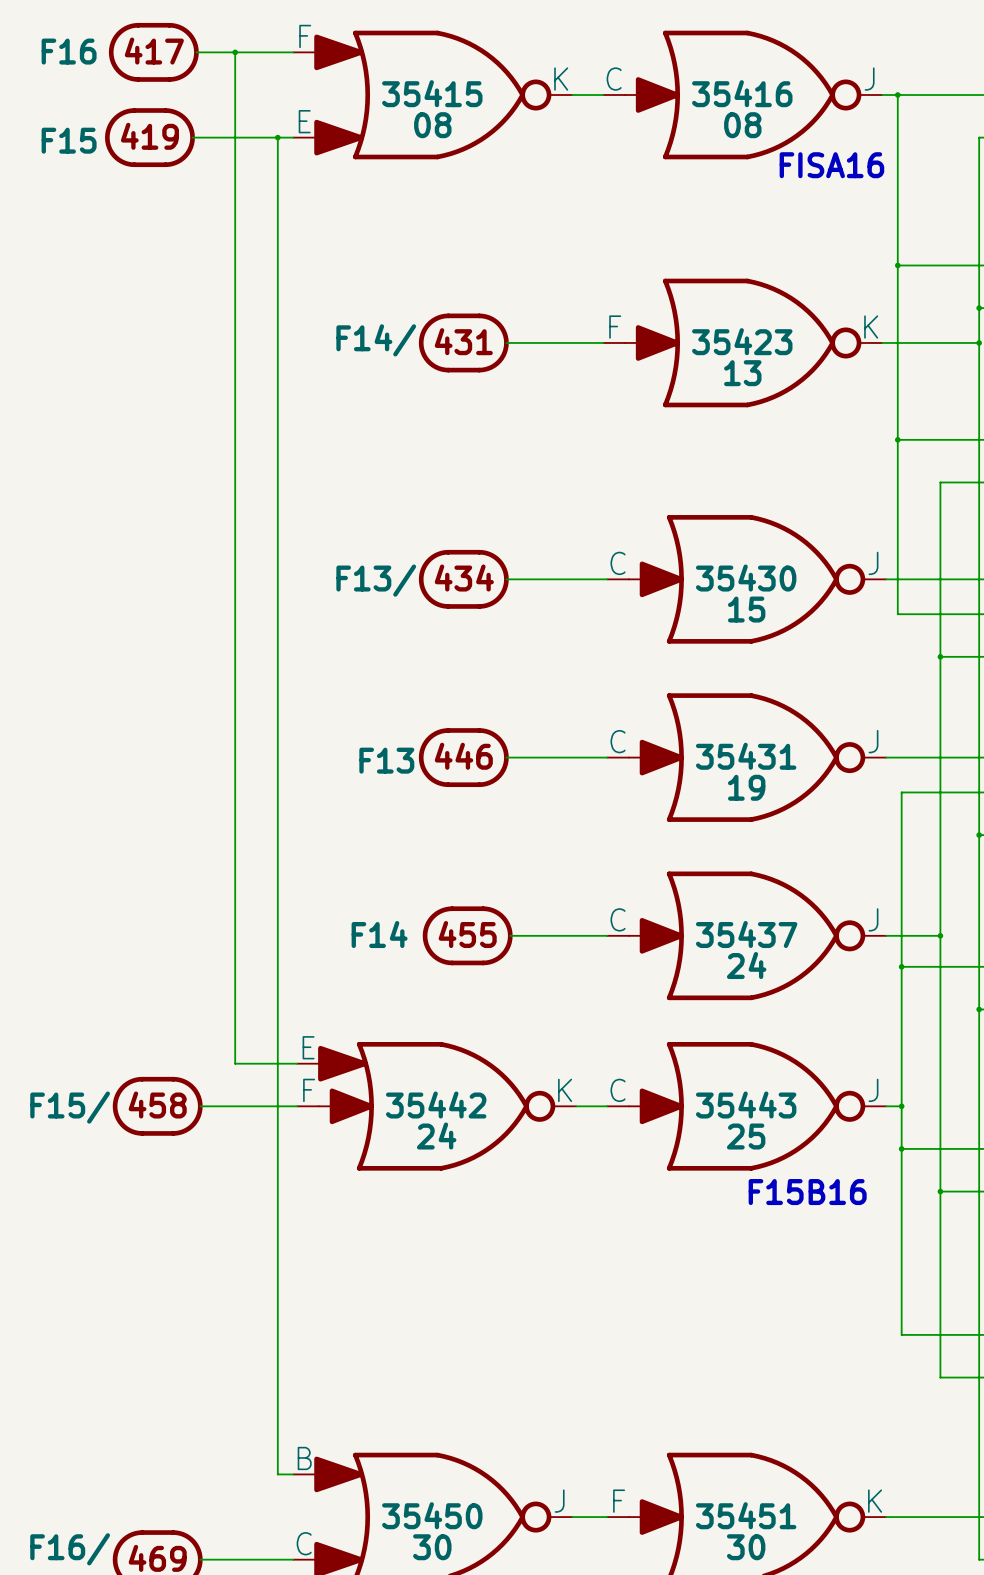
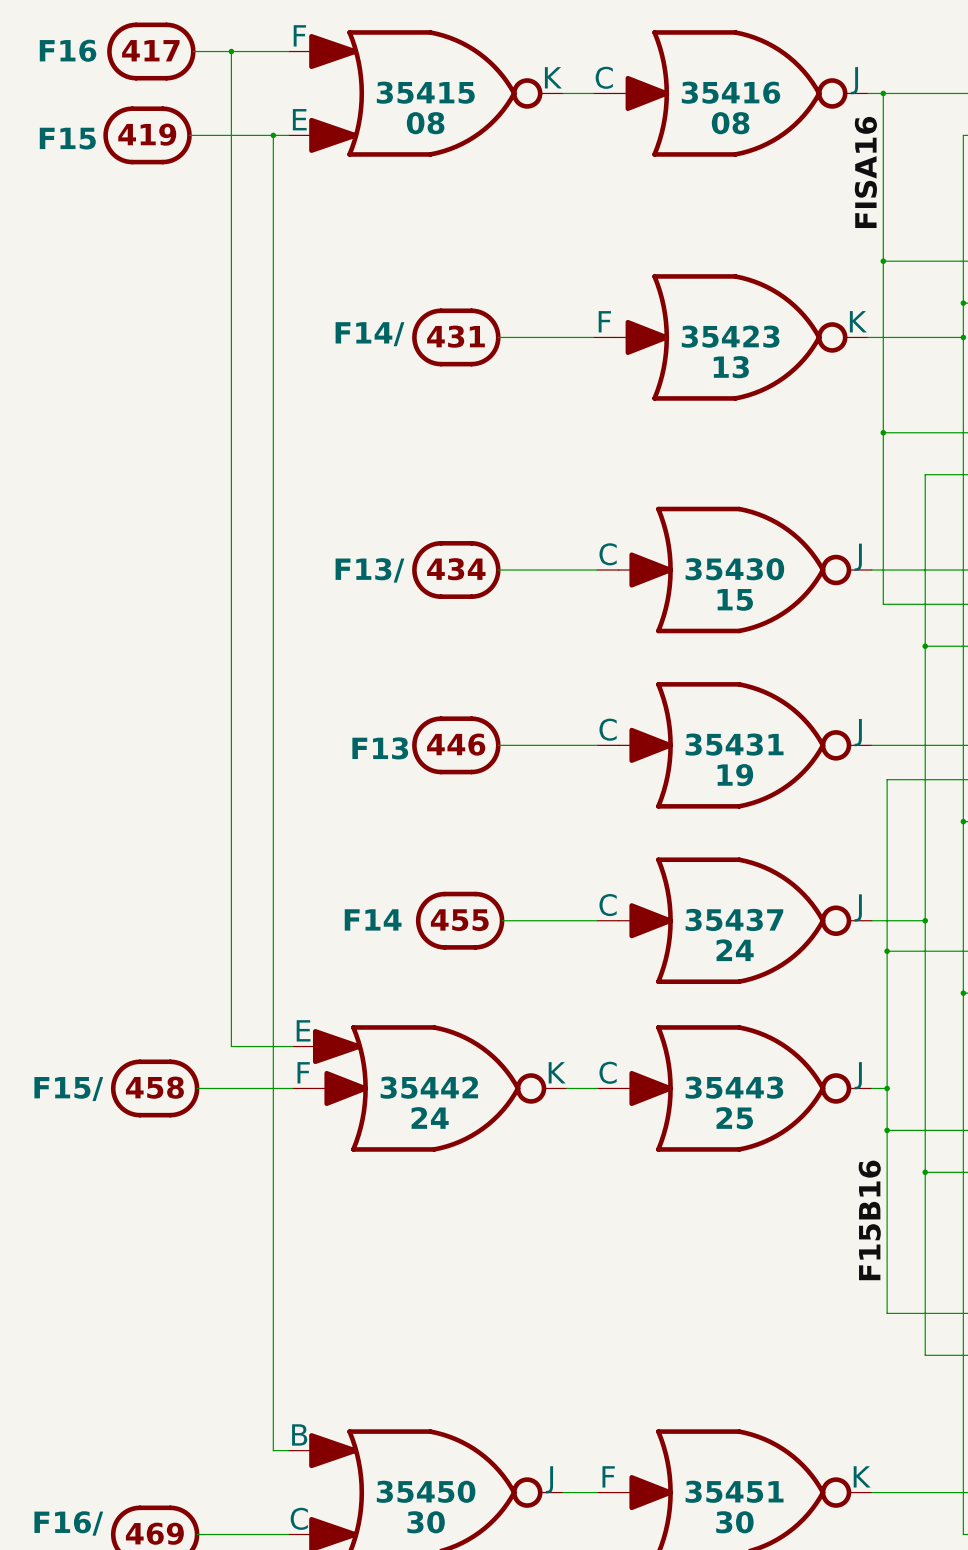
text: FISA16 (831, 165) -> none
label: none -> FISA16 (865, 172)
text: F15B16 (807, 1192) -> none
label: none -> F15B16 (869, 1220)

